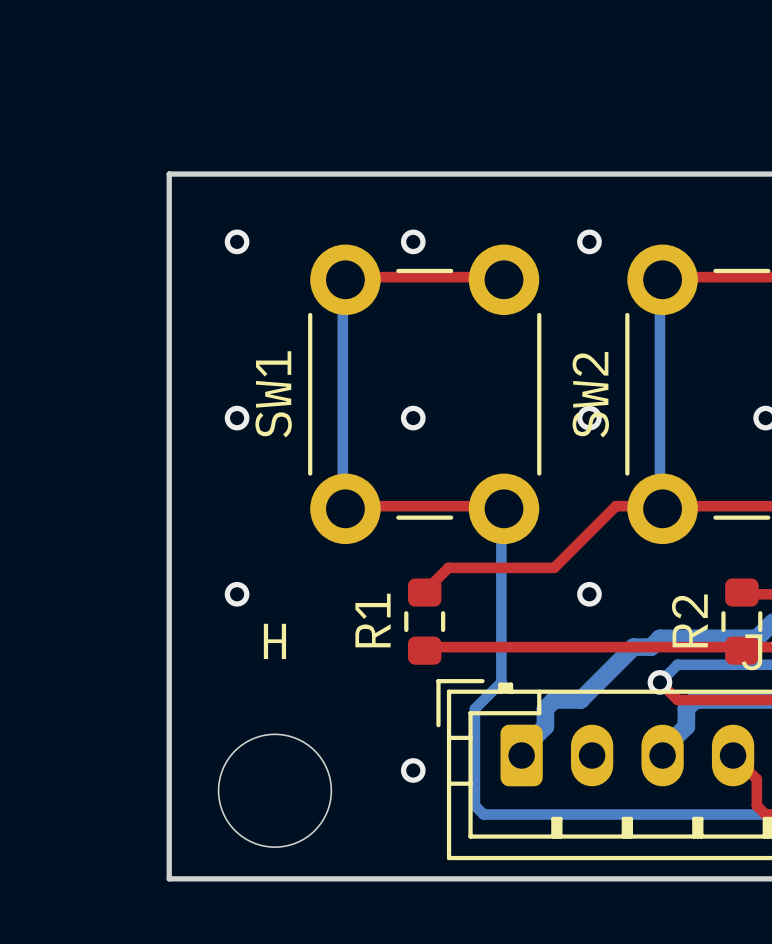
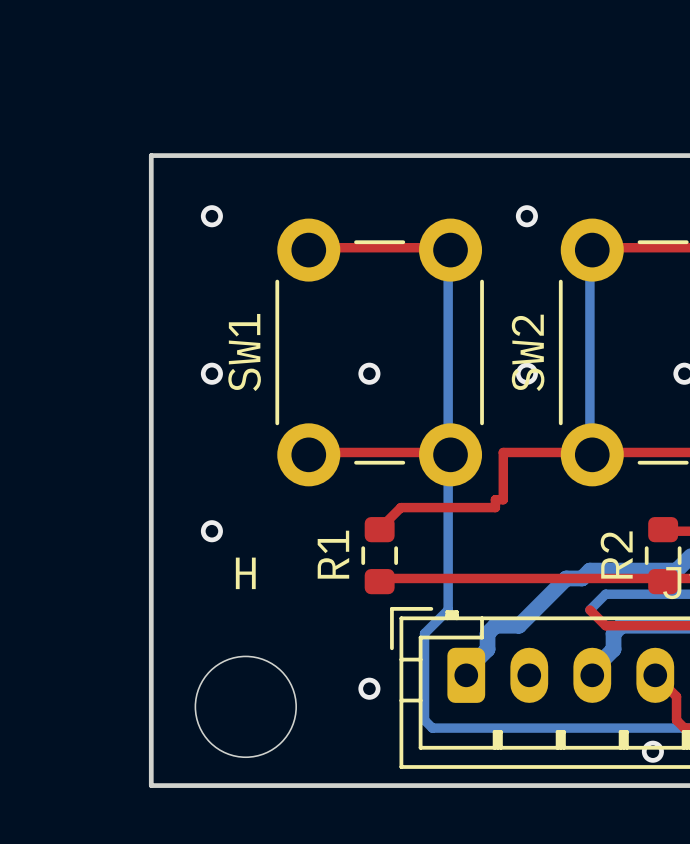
via: (413, 241) -> none
bottom track: (342, 277) (342, 506) -> (448, 247) (448, 452)
top track: (615, 506) (554, 567) -> (550, 452) (503, 452) (503, 499) (495, 499) (495, 507)
via: (589, 594) -> none
via: (659, 682) -> none
via: none -> (652, 751)

